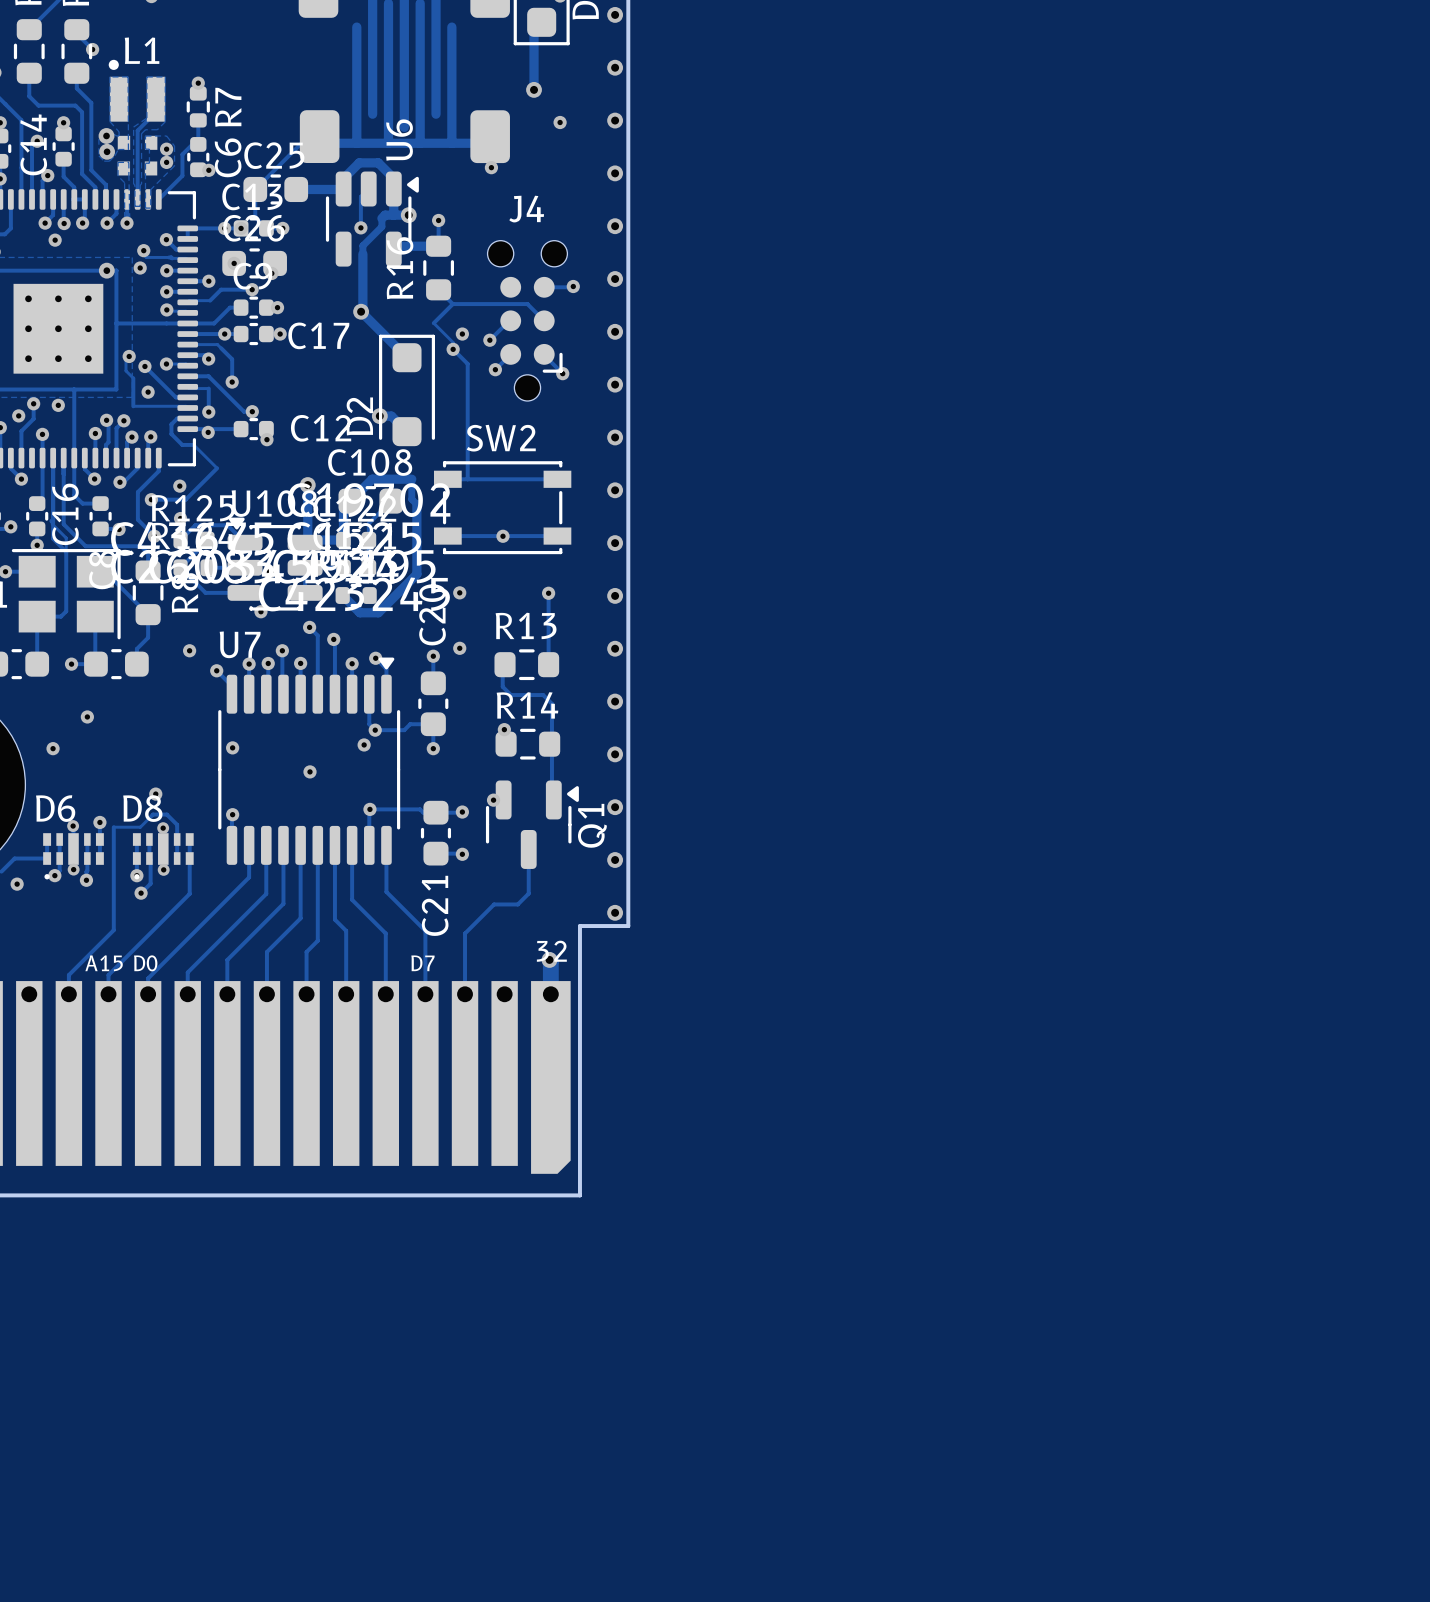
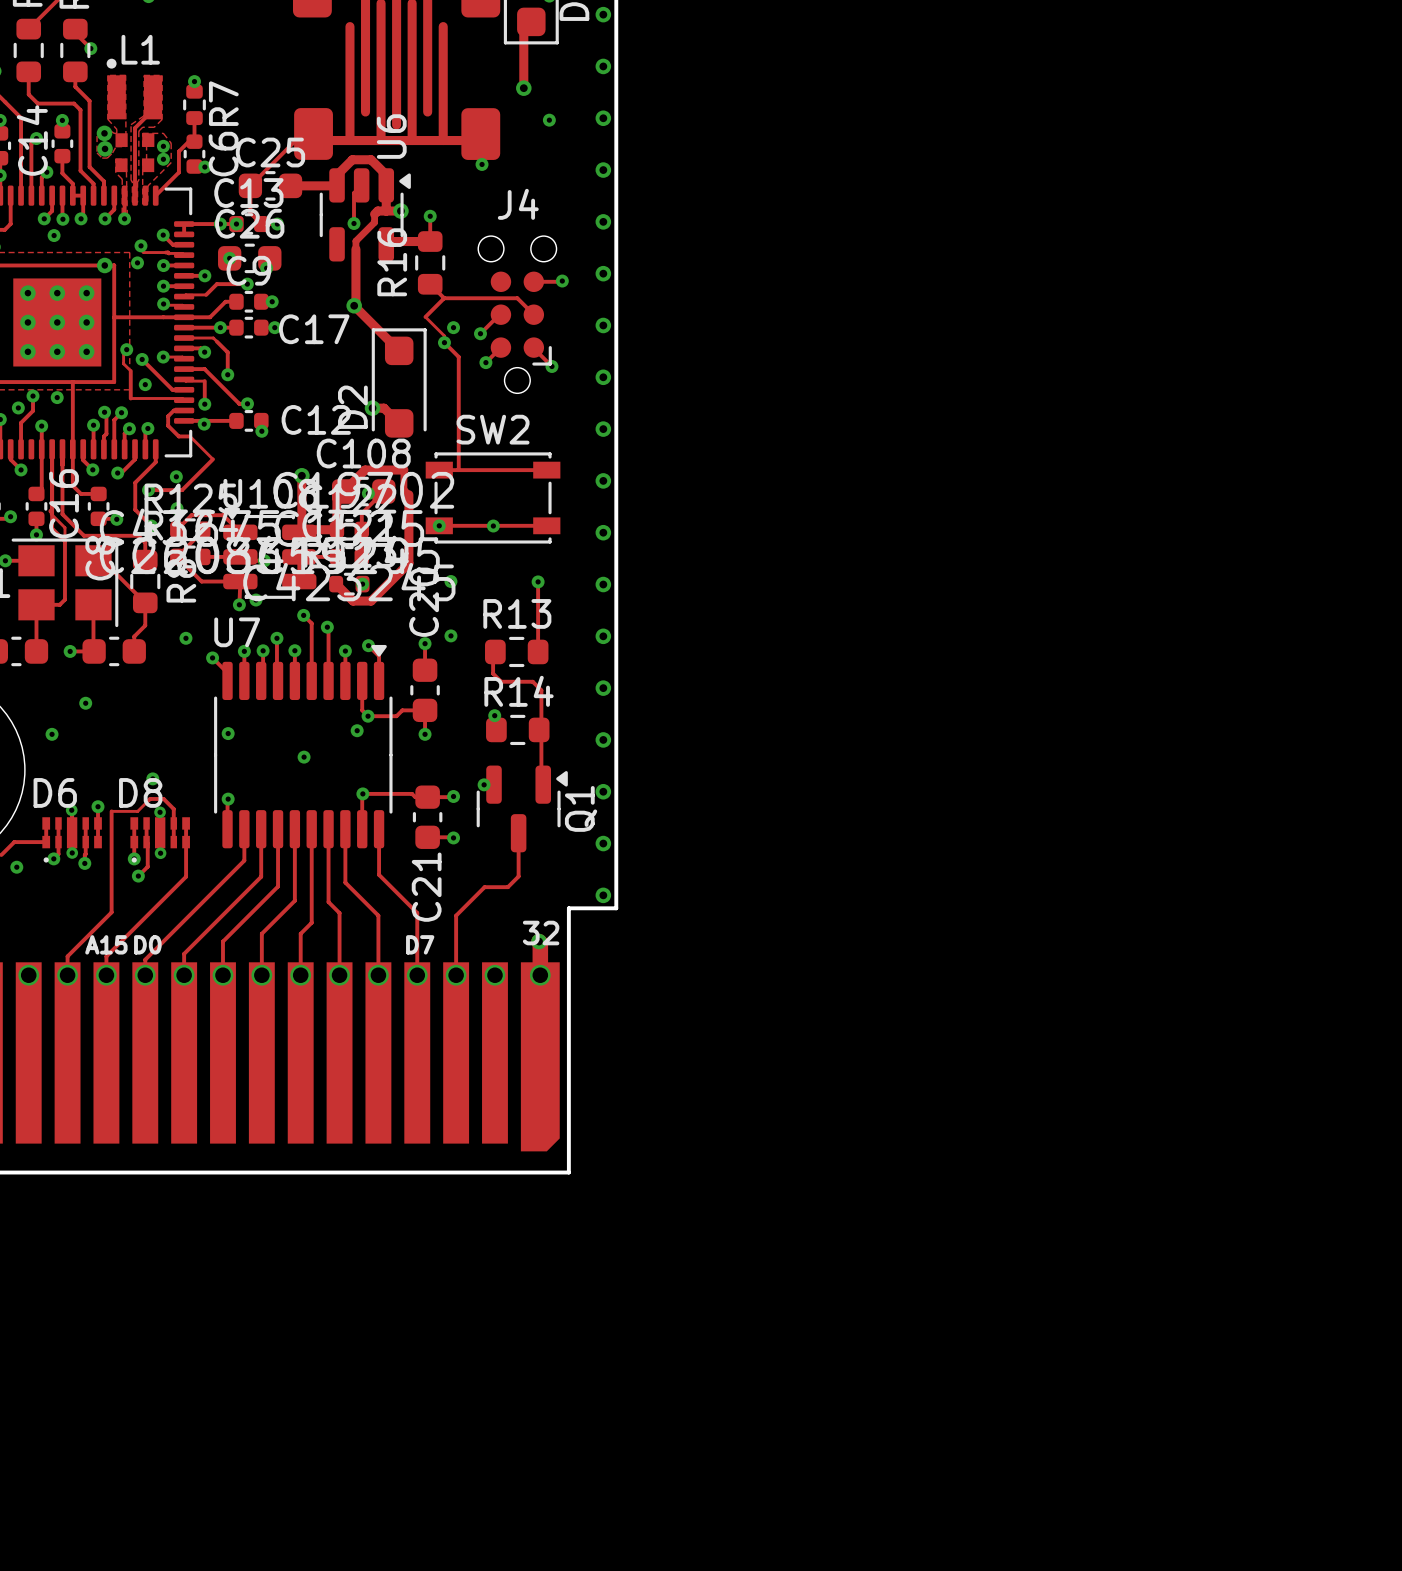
via: none -> (368, 493)
via: none -> (439, 525)
track: none -> (240, 581) (239, 604)
via: none -> (362, 584)
via: none -> (239, 604)

